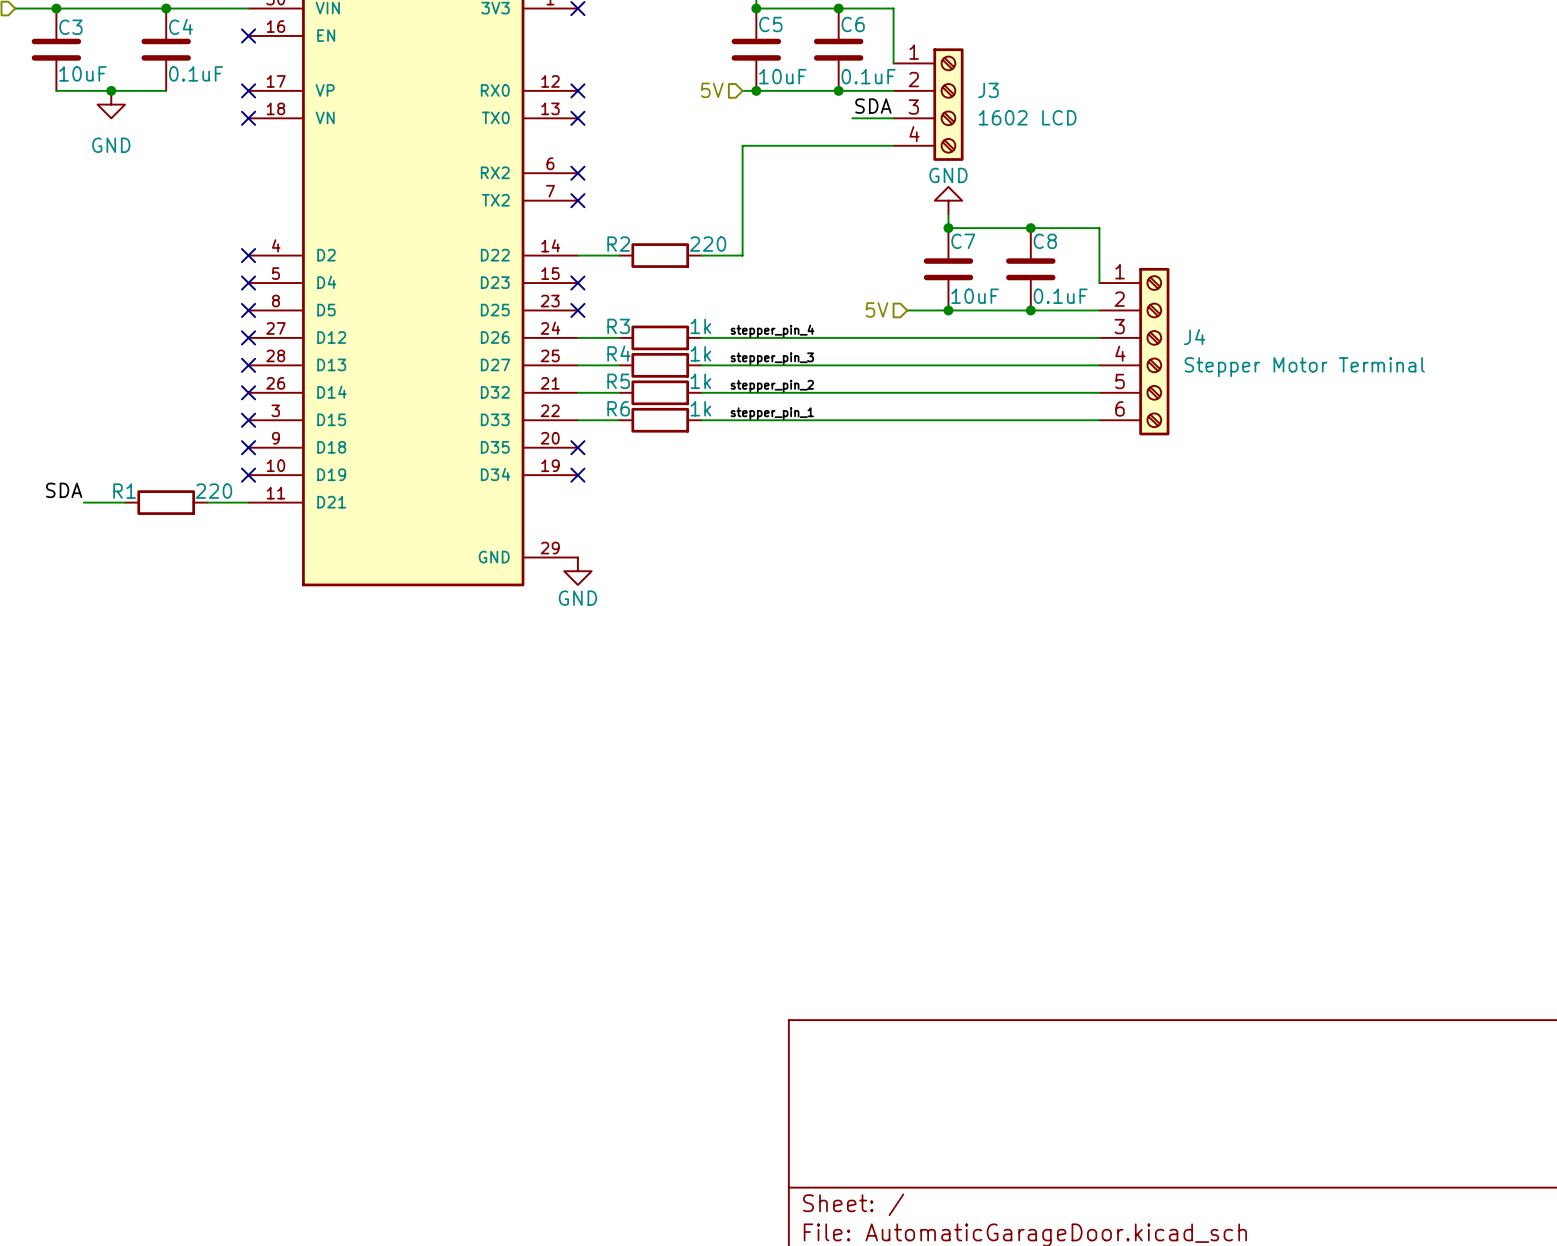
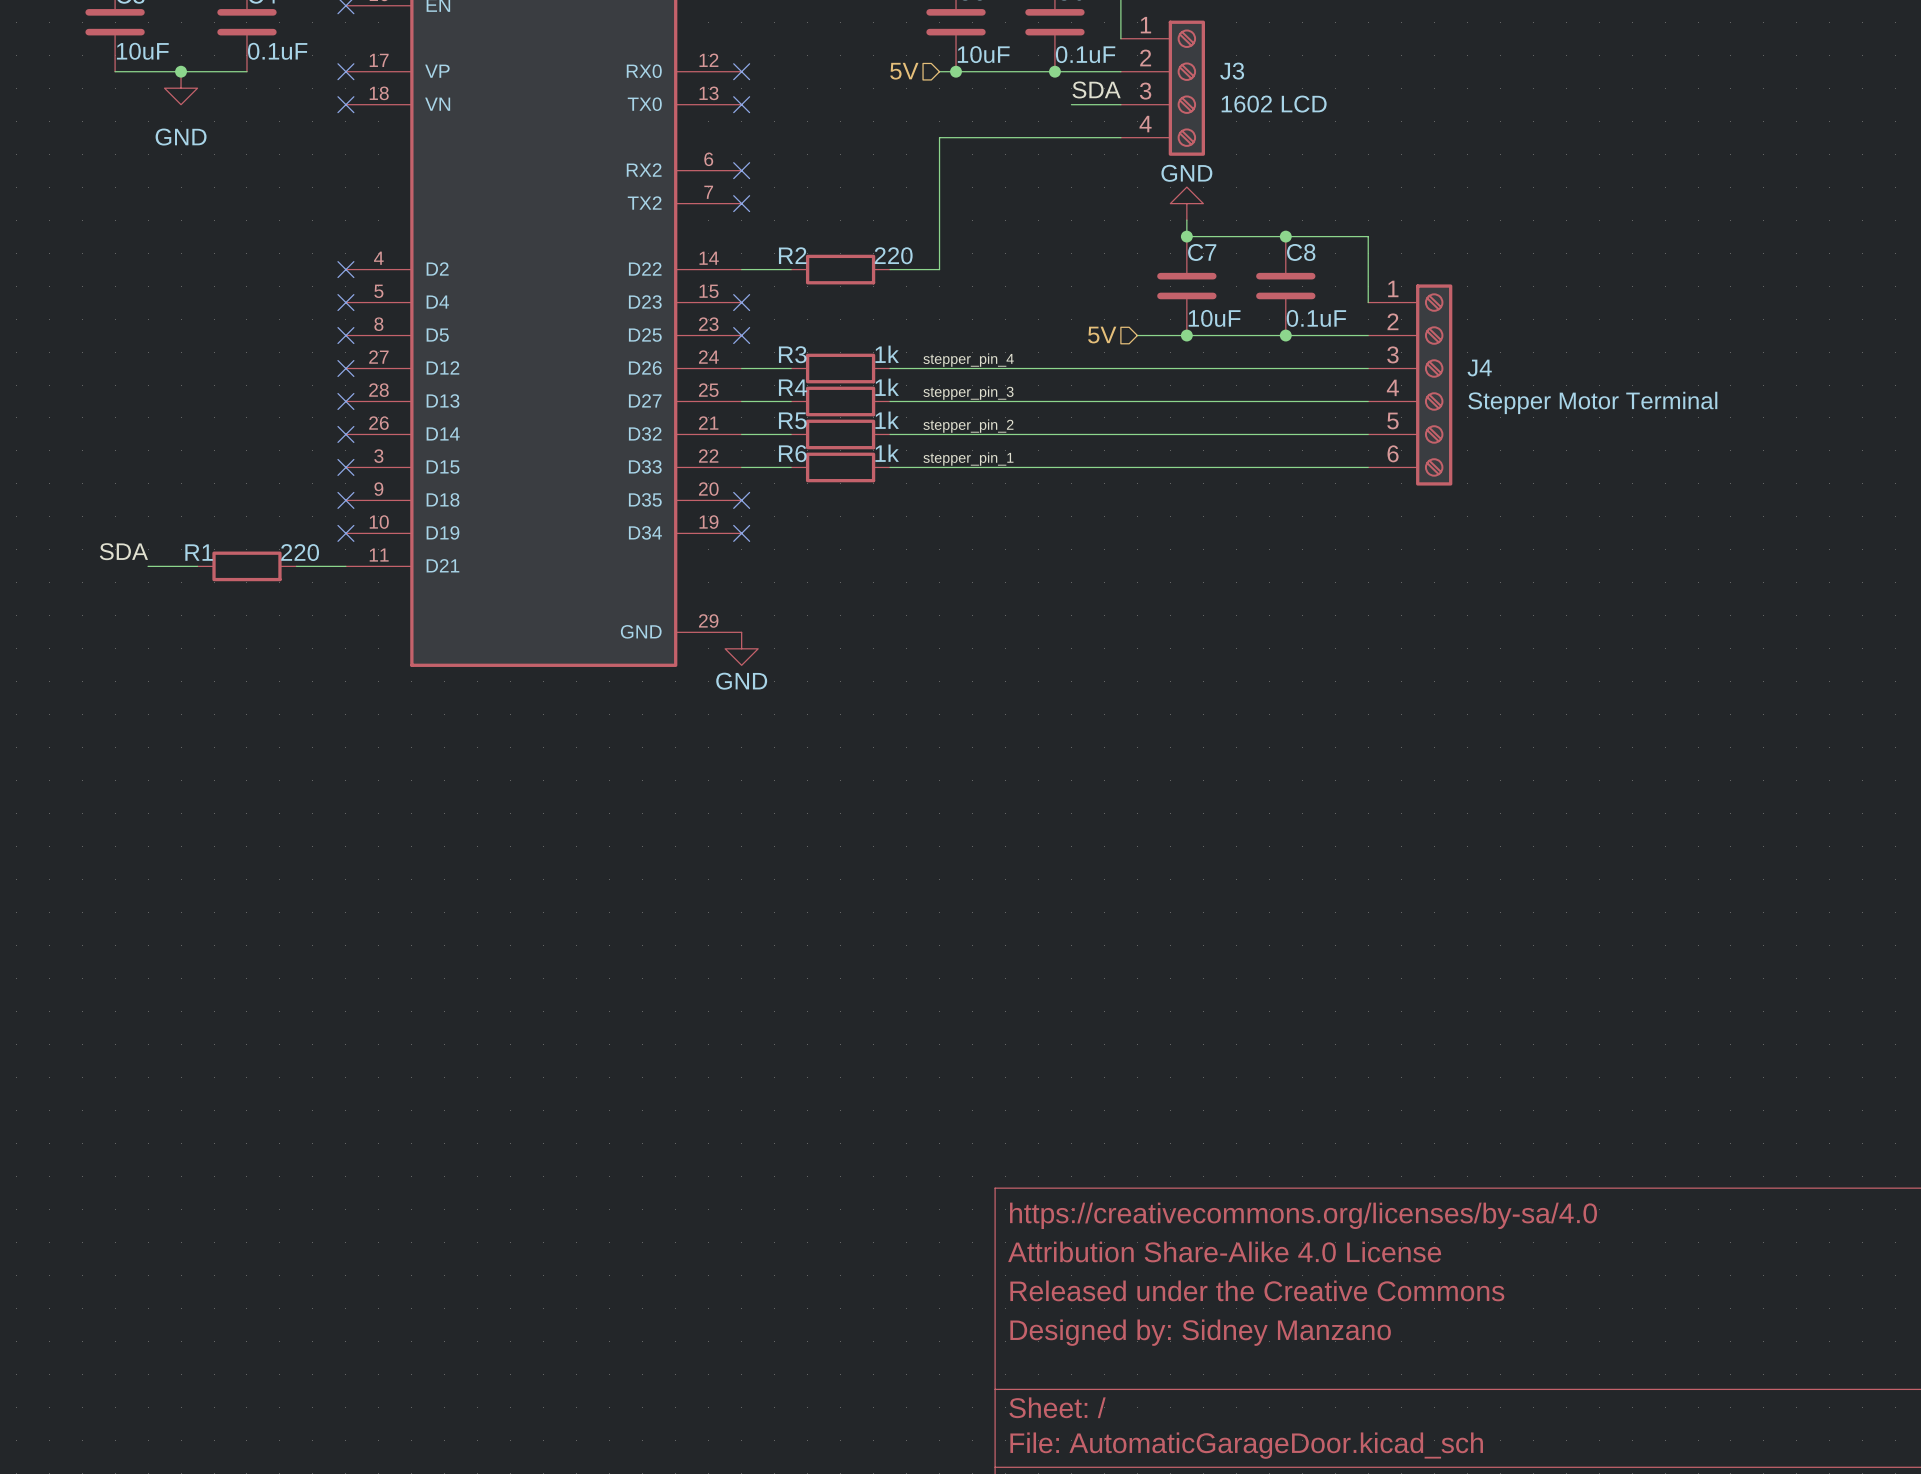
title block: none -> https://creativecommons.org/licenses/by-sa/4.0 (1303, 1215)
title block: none -> Attribution Share-Alike 4.0 License (1224, 1251)
title block: none -> Released under the Creative Commons (1257, 1290)
title block: none -> Designed by: Sidney Manzano (1200, 1332)

